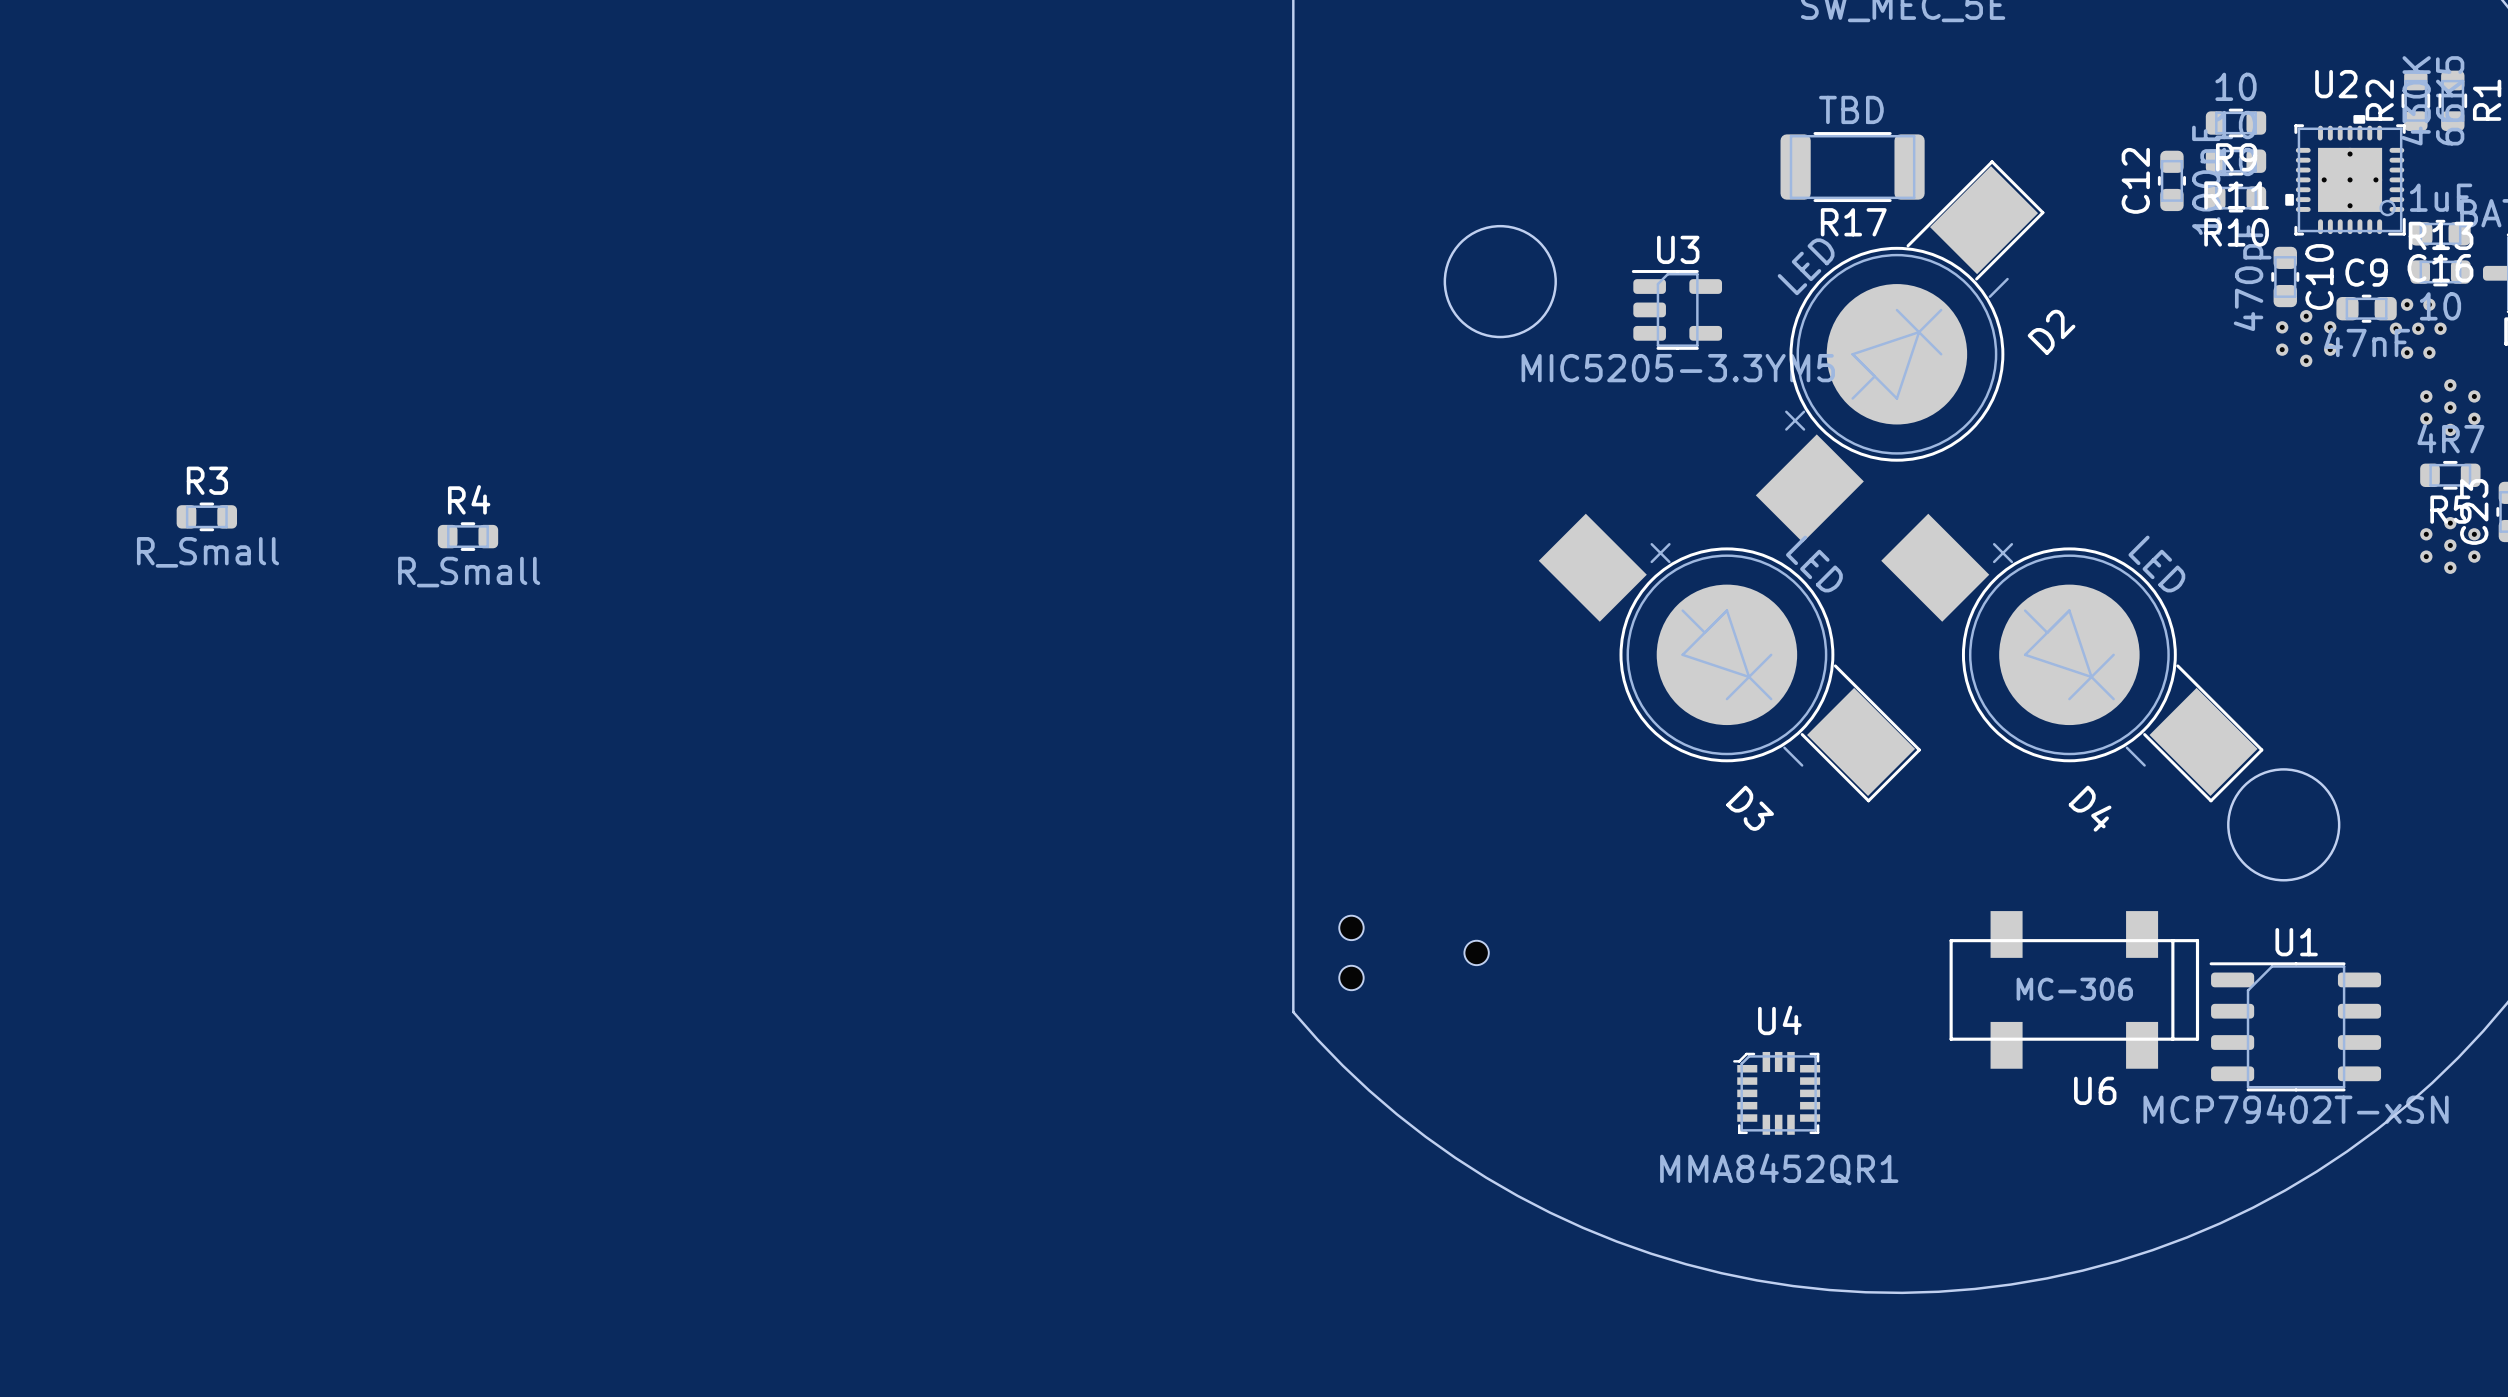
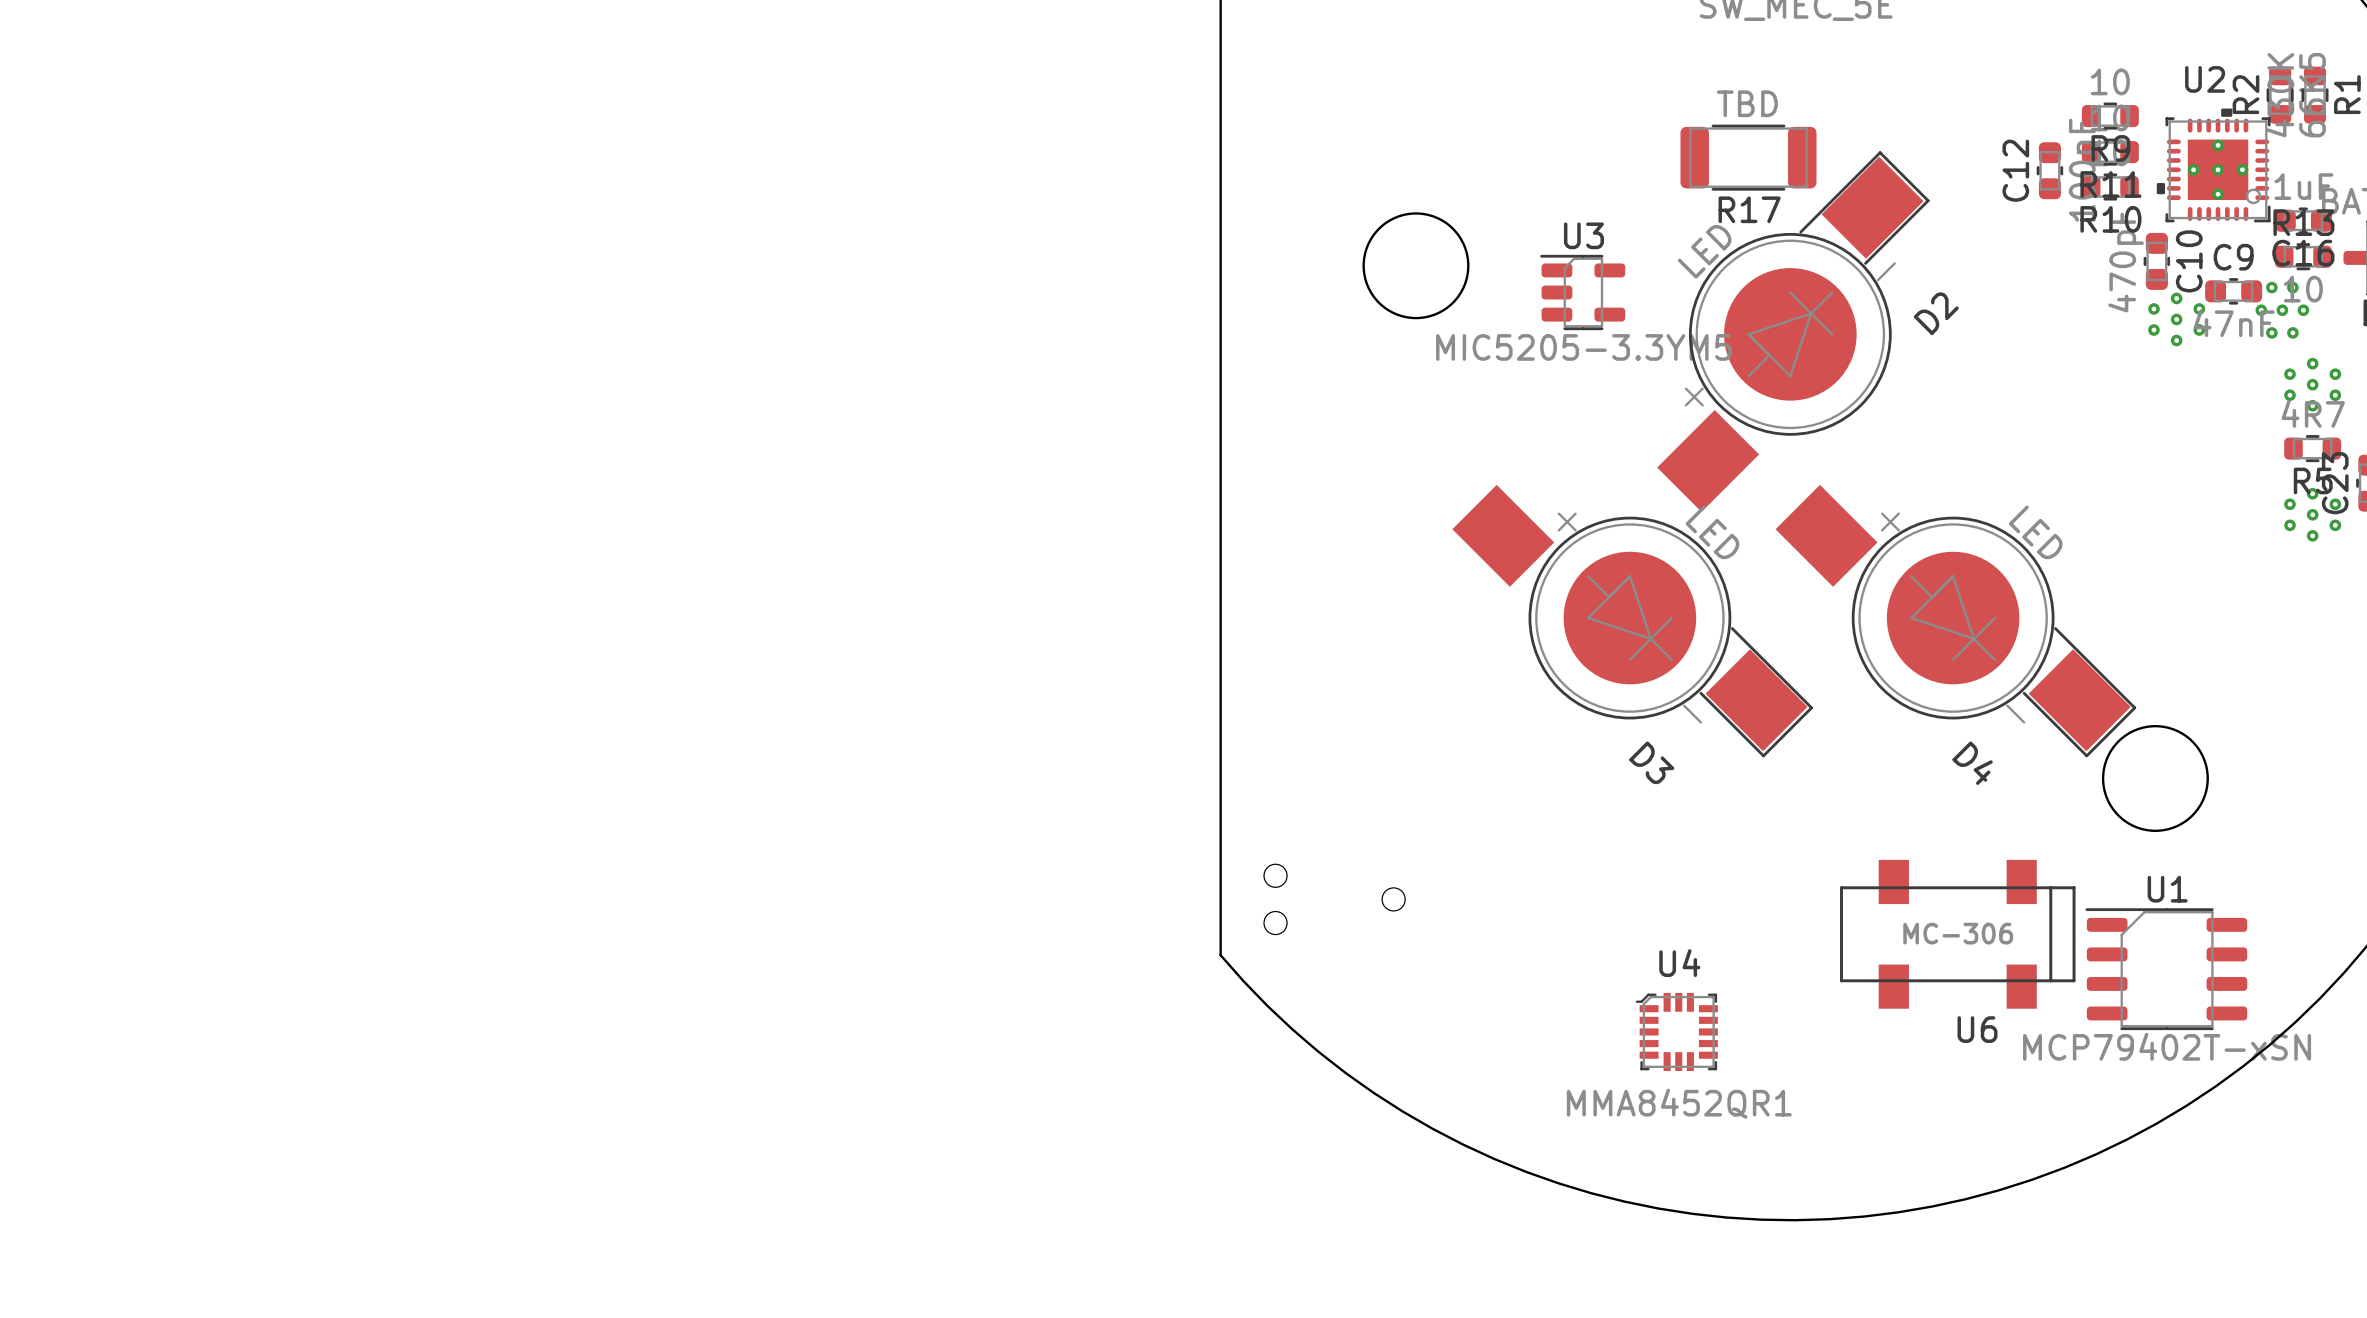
R3: R_Small (206, 516) -> none
R4: R_Small (467, 536) -> none

